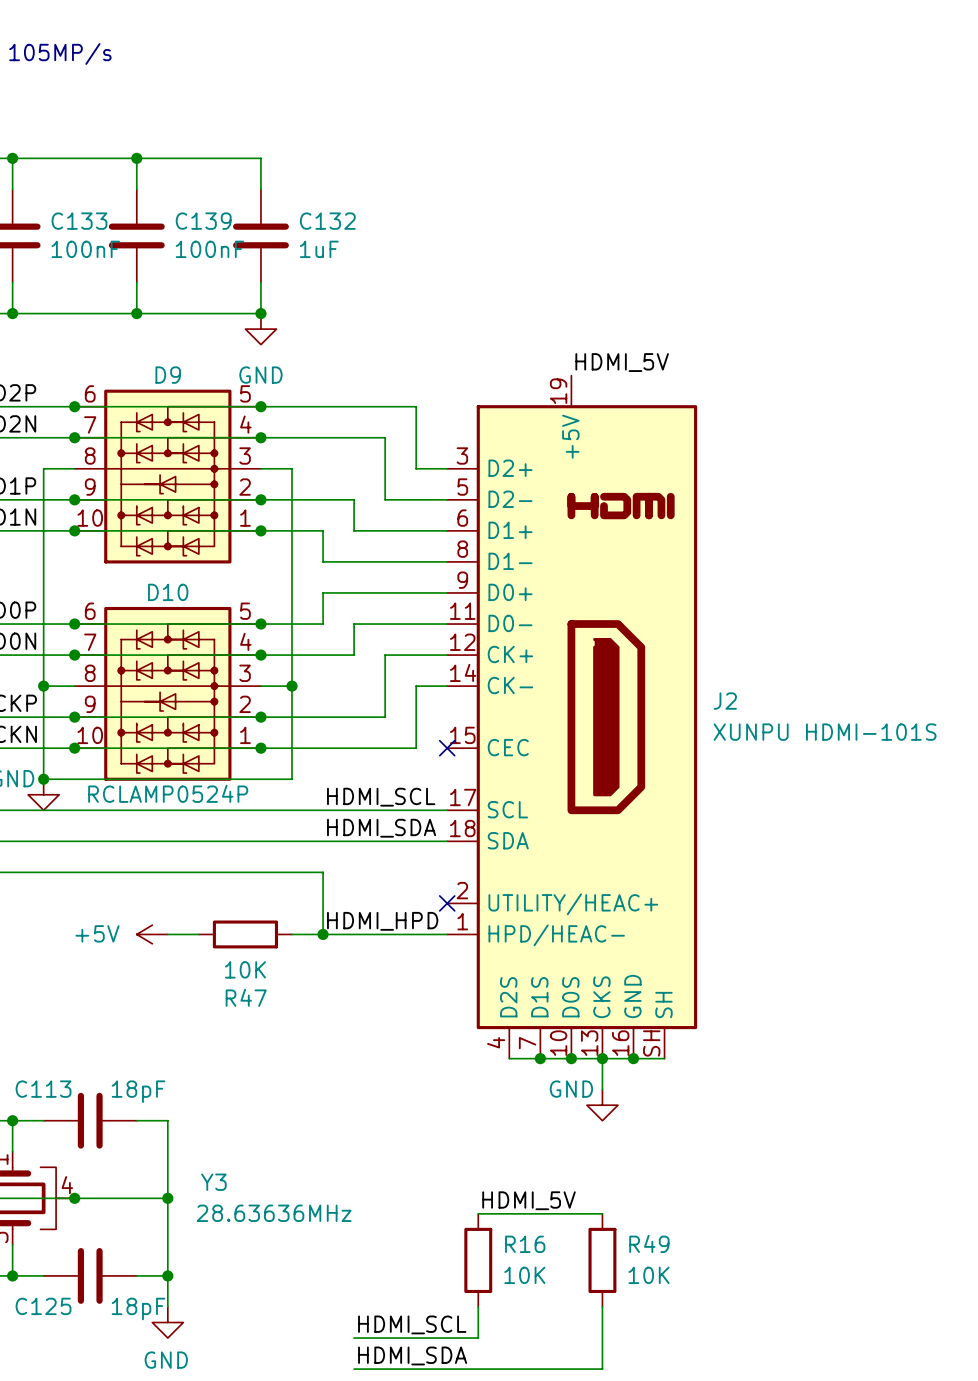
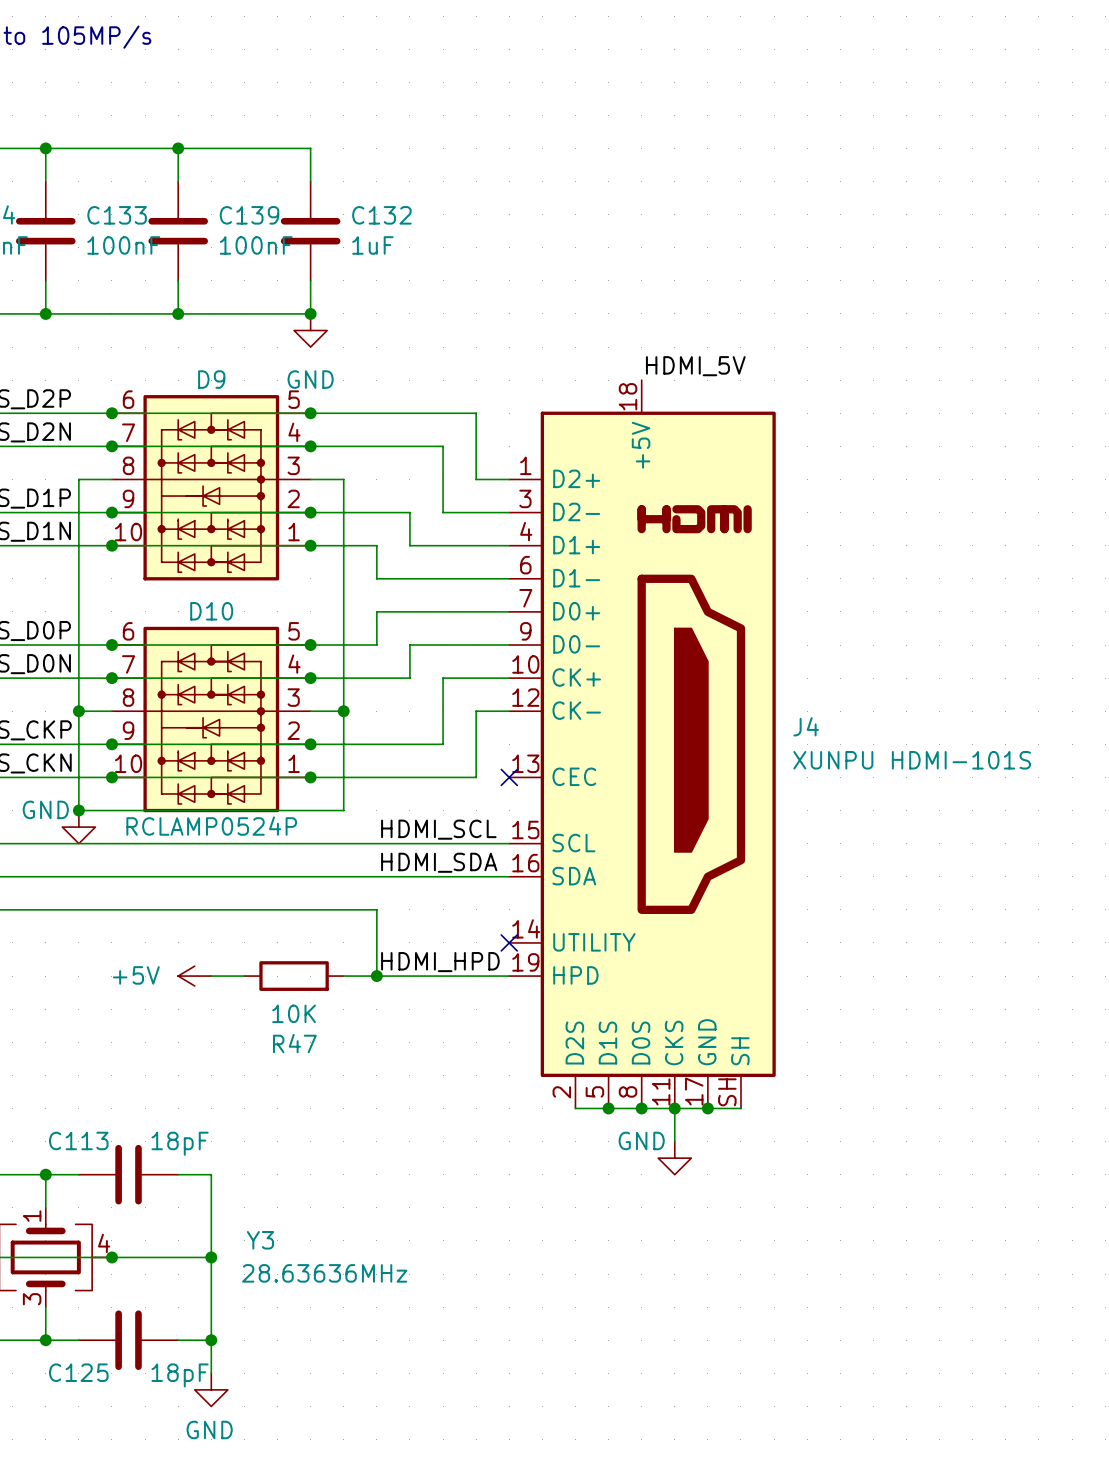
J2: XUNPU HDMI-101S (572, 717) -> none
J4: none -> XUNPU HDMI-101S (642, 744)
label: HDMI_5V (529, 1200) -> none
wire: (478, 1213) (602, 1213) -> none
R16: 10K (478, 1260) -> none
R49: 10K (602, 1260) -> none
wire: (478, 1306) (478, 1338) (354, 1338) -> none
wire: (602, 1306) (602, 1369) (354, 1369) -> none
label: HDMI_SCL (412, 1324) -> none
label: HDMI_SDA (412, 1355) -> none

